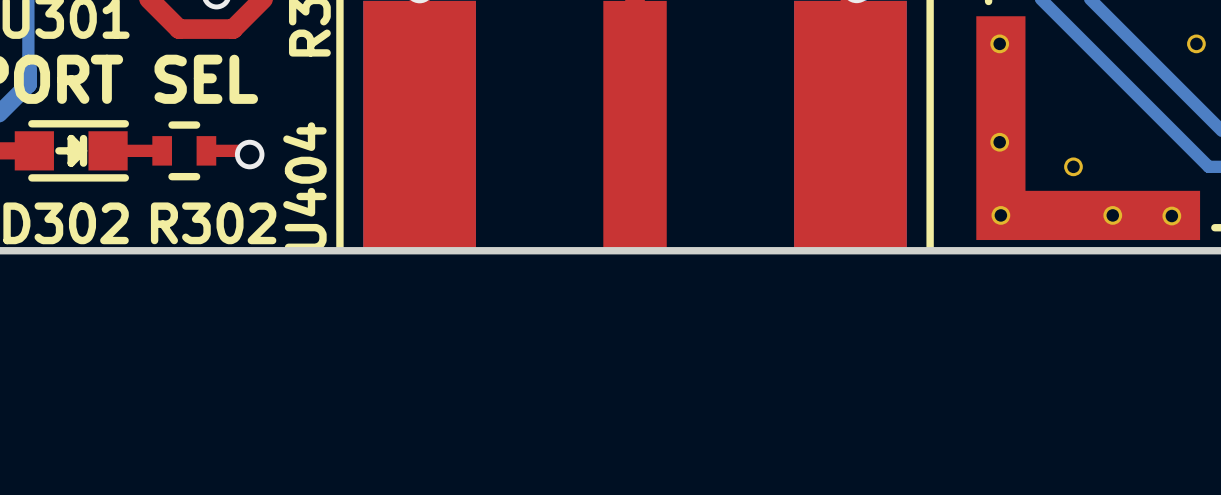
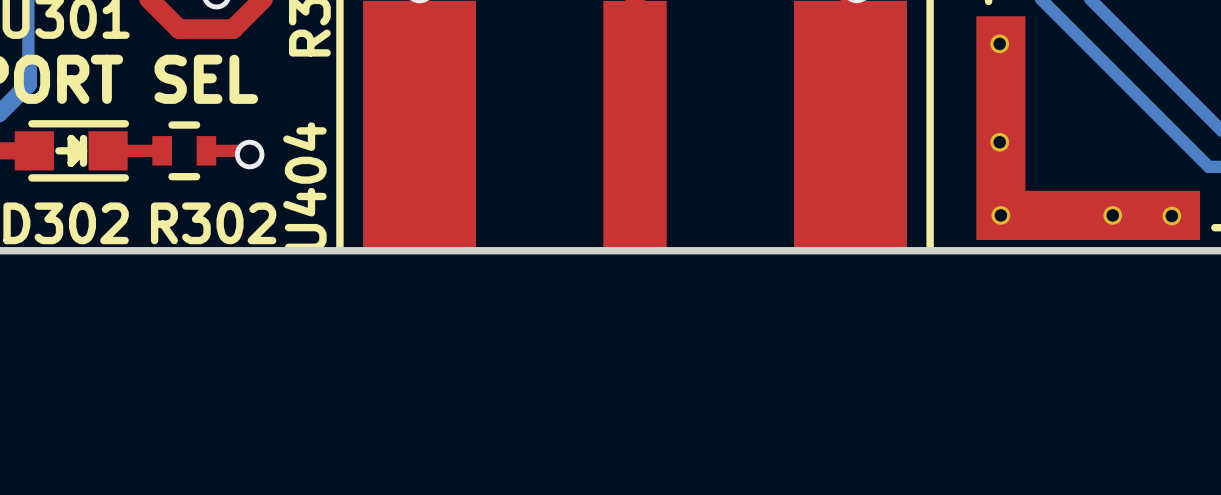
part: (1196, 43) -> none
part: (1073, 166) -> none

